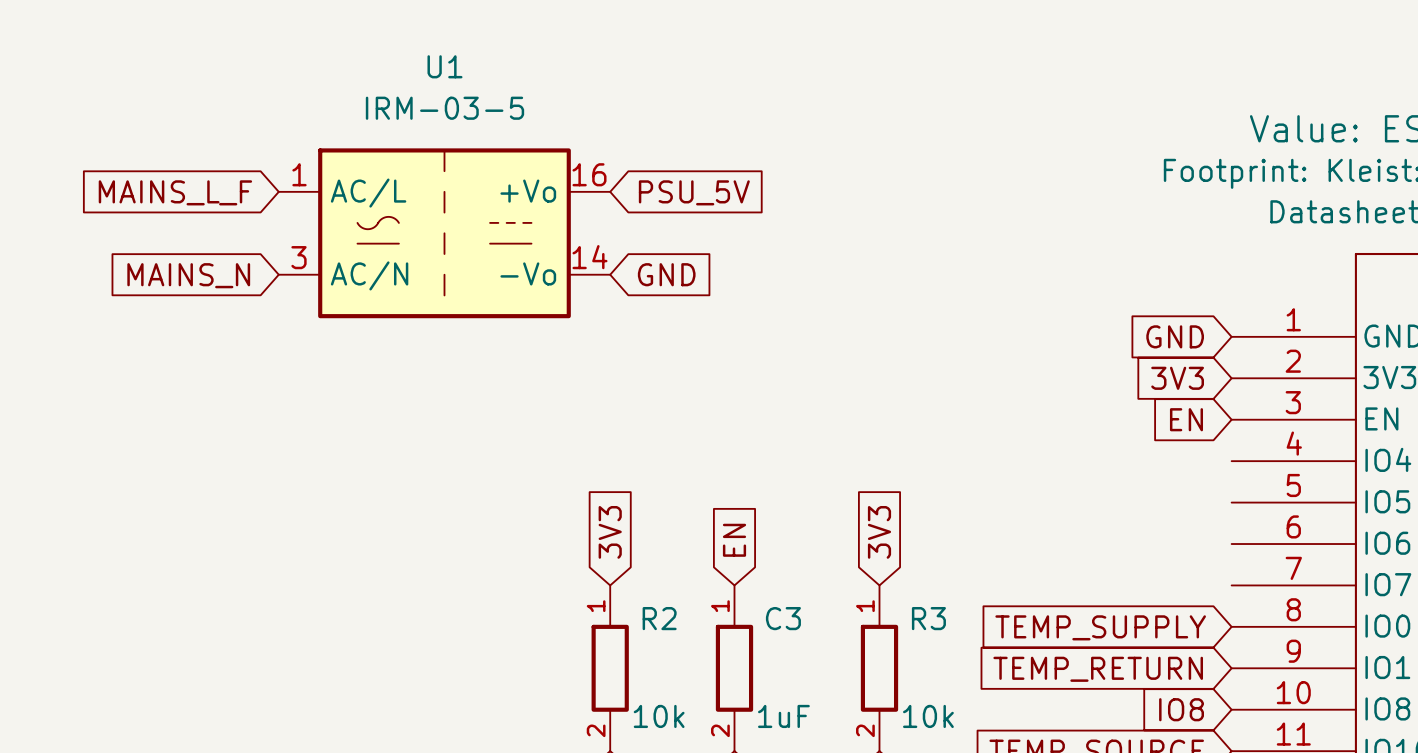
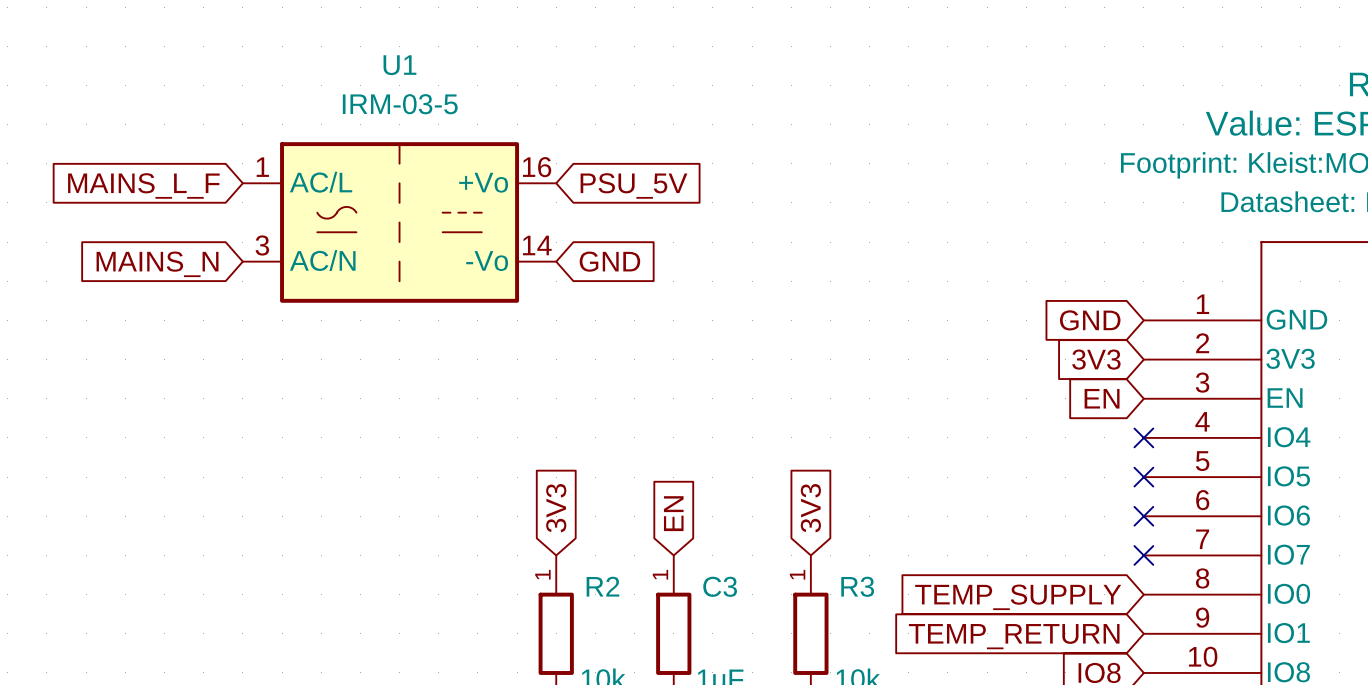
no-connect mark: none -> (1143, 437)
no-connect mark: none -> (1143, 477)
no-connect mark: none -> (1143, 516)
no-connect mark: none -> (1143, 555)

